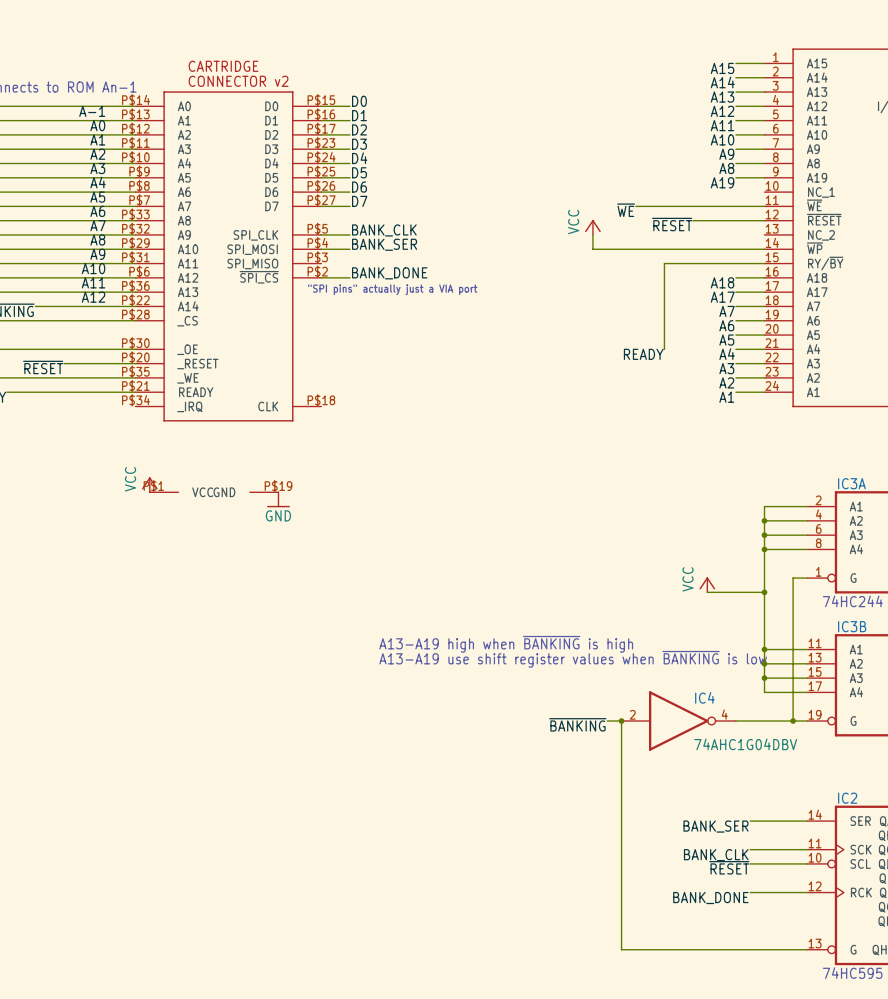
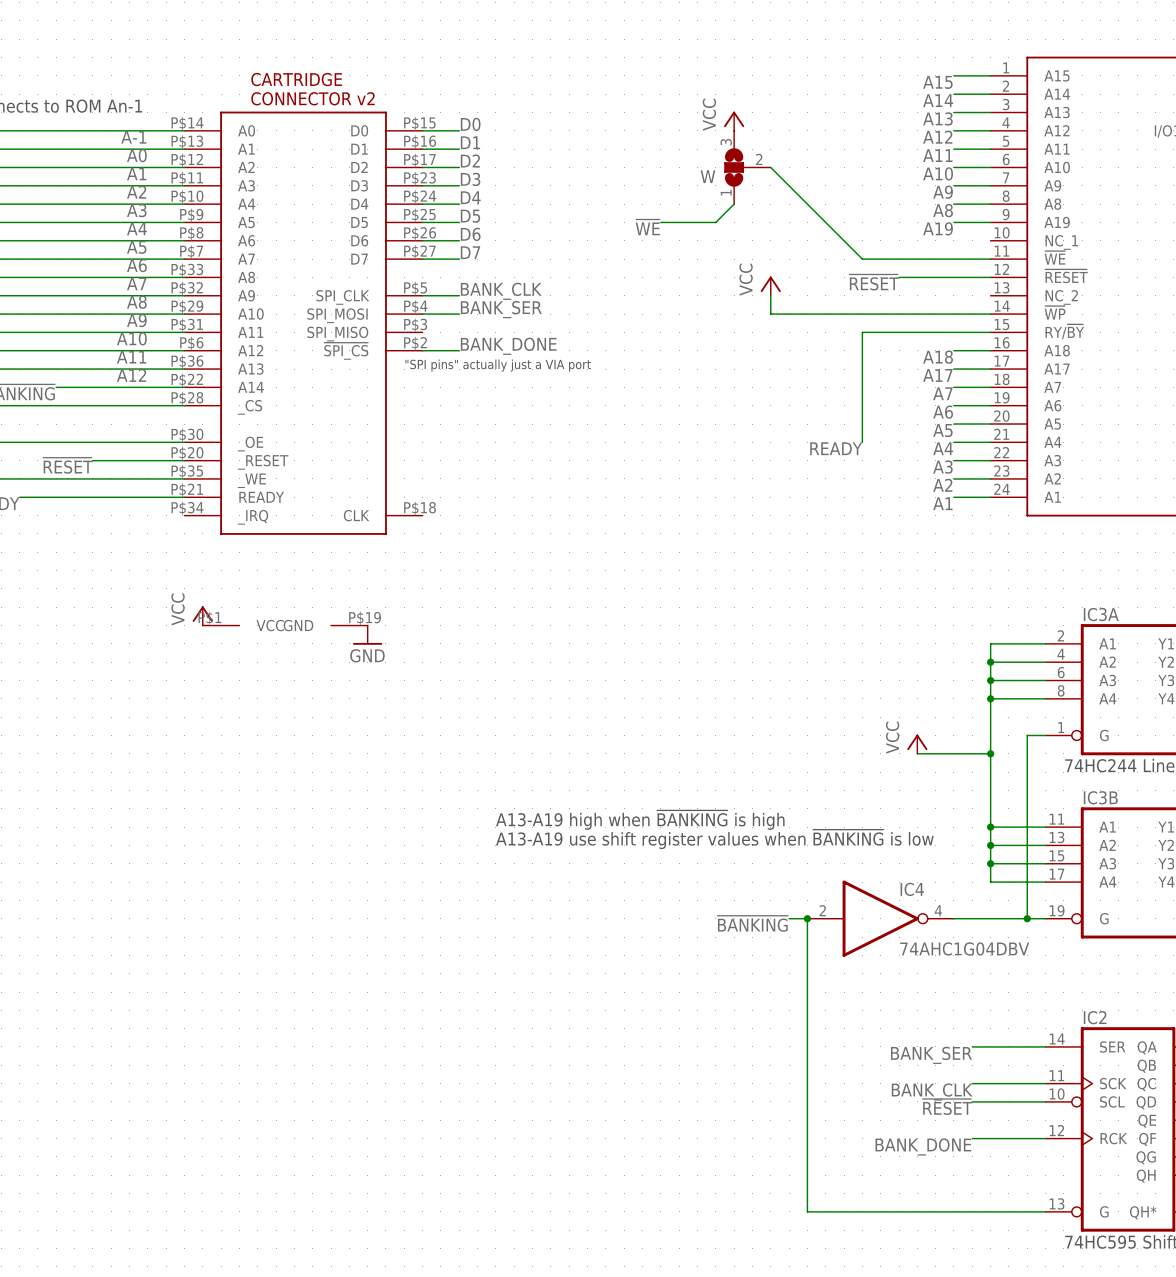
power symbol: none -> VCC (734, 121)
W: none -> (747, 167)
wire: none -> (734, 204) (715, 222) (660, 222)
wire: (635, 206) (664, 206) -> (770, 167) (862, 259)
label position: ~{WE} (626, 210) -> ~{WE} (647, 227)

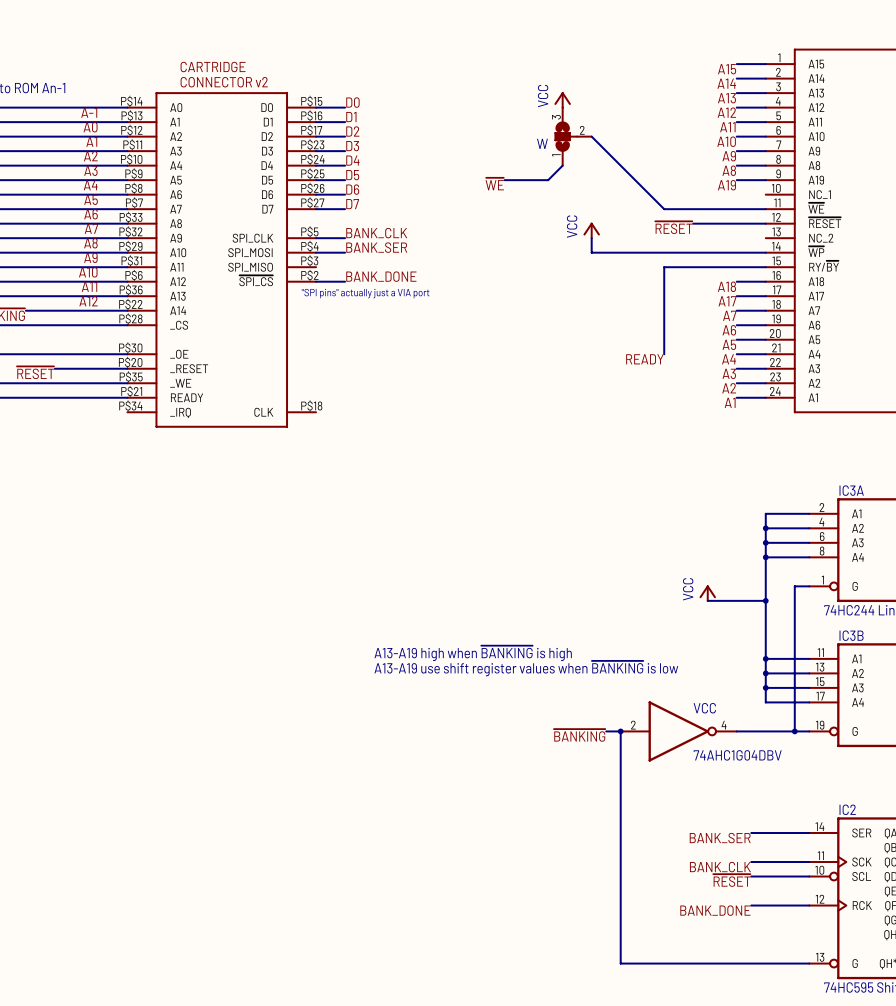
power symbol: VCC (202, 615) -> none
part: (285, 625) -> none
power symbol: GND (367, 635) -> none
IC4 name: IC4 (912, 889) -> VCC (704, 708)

